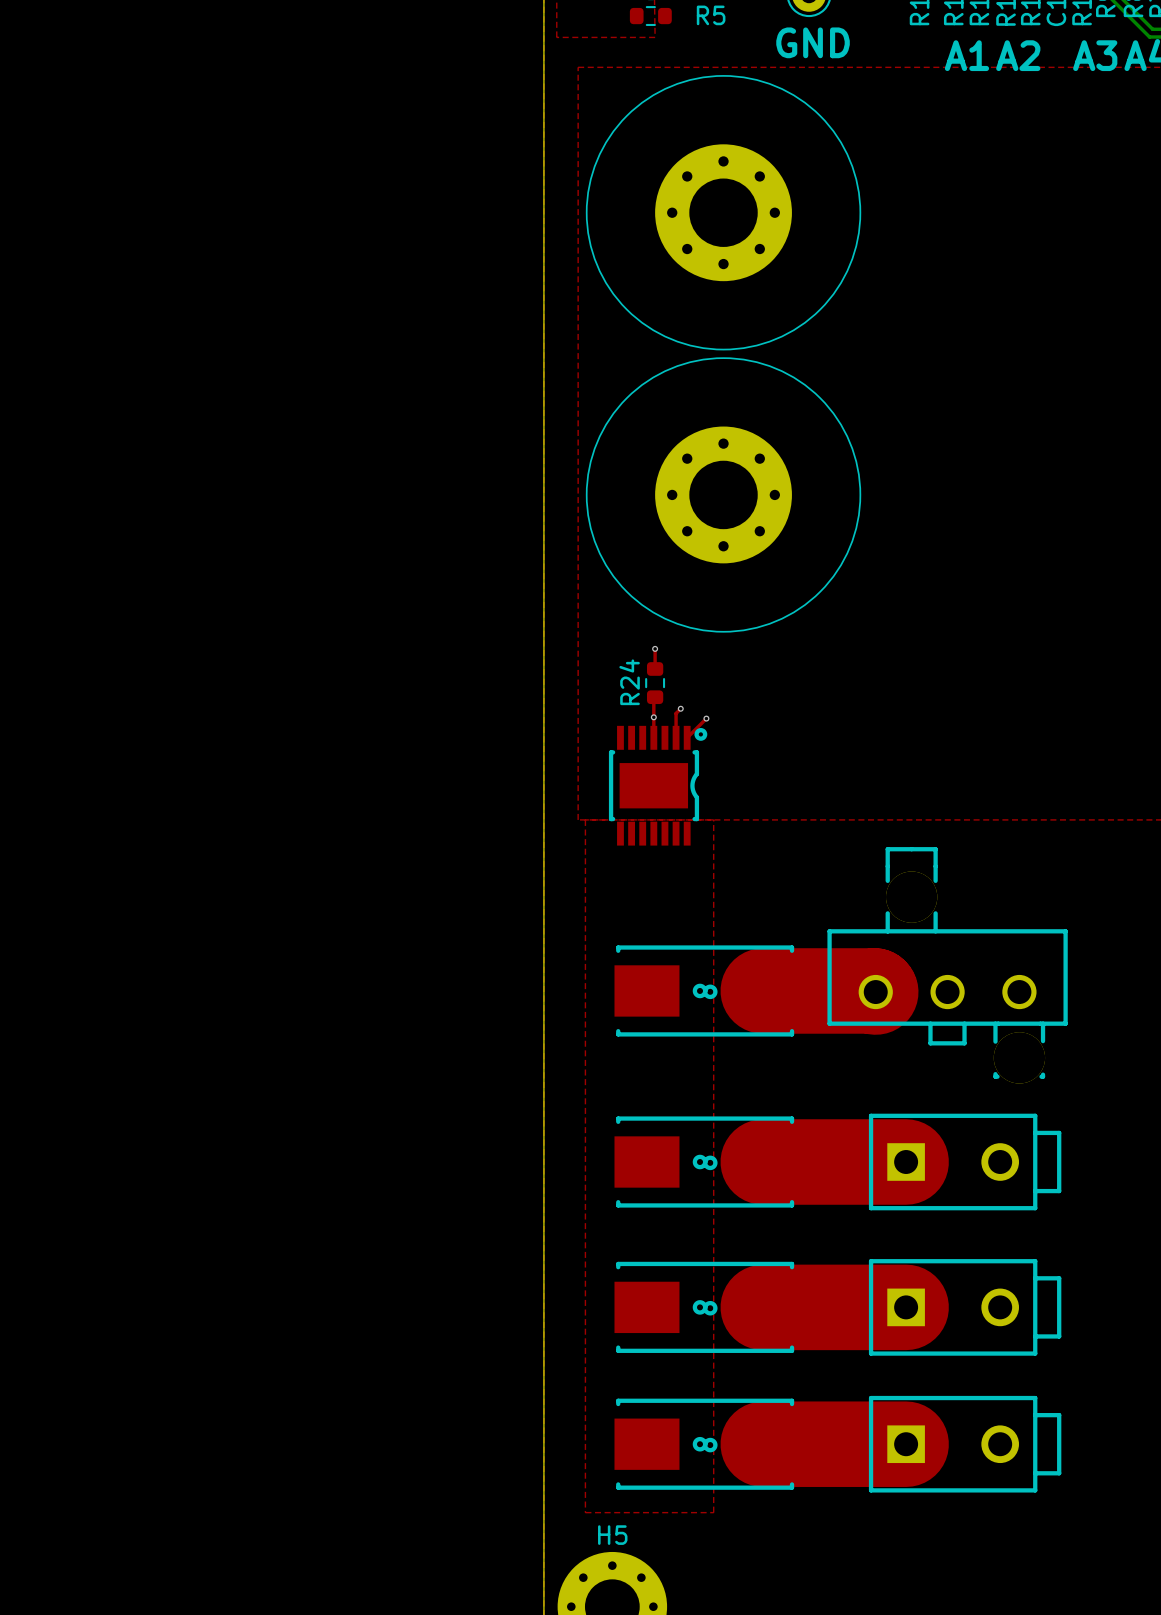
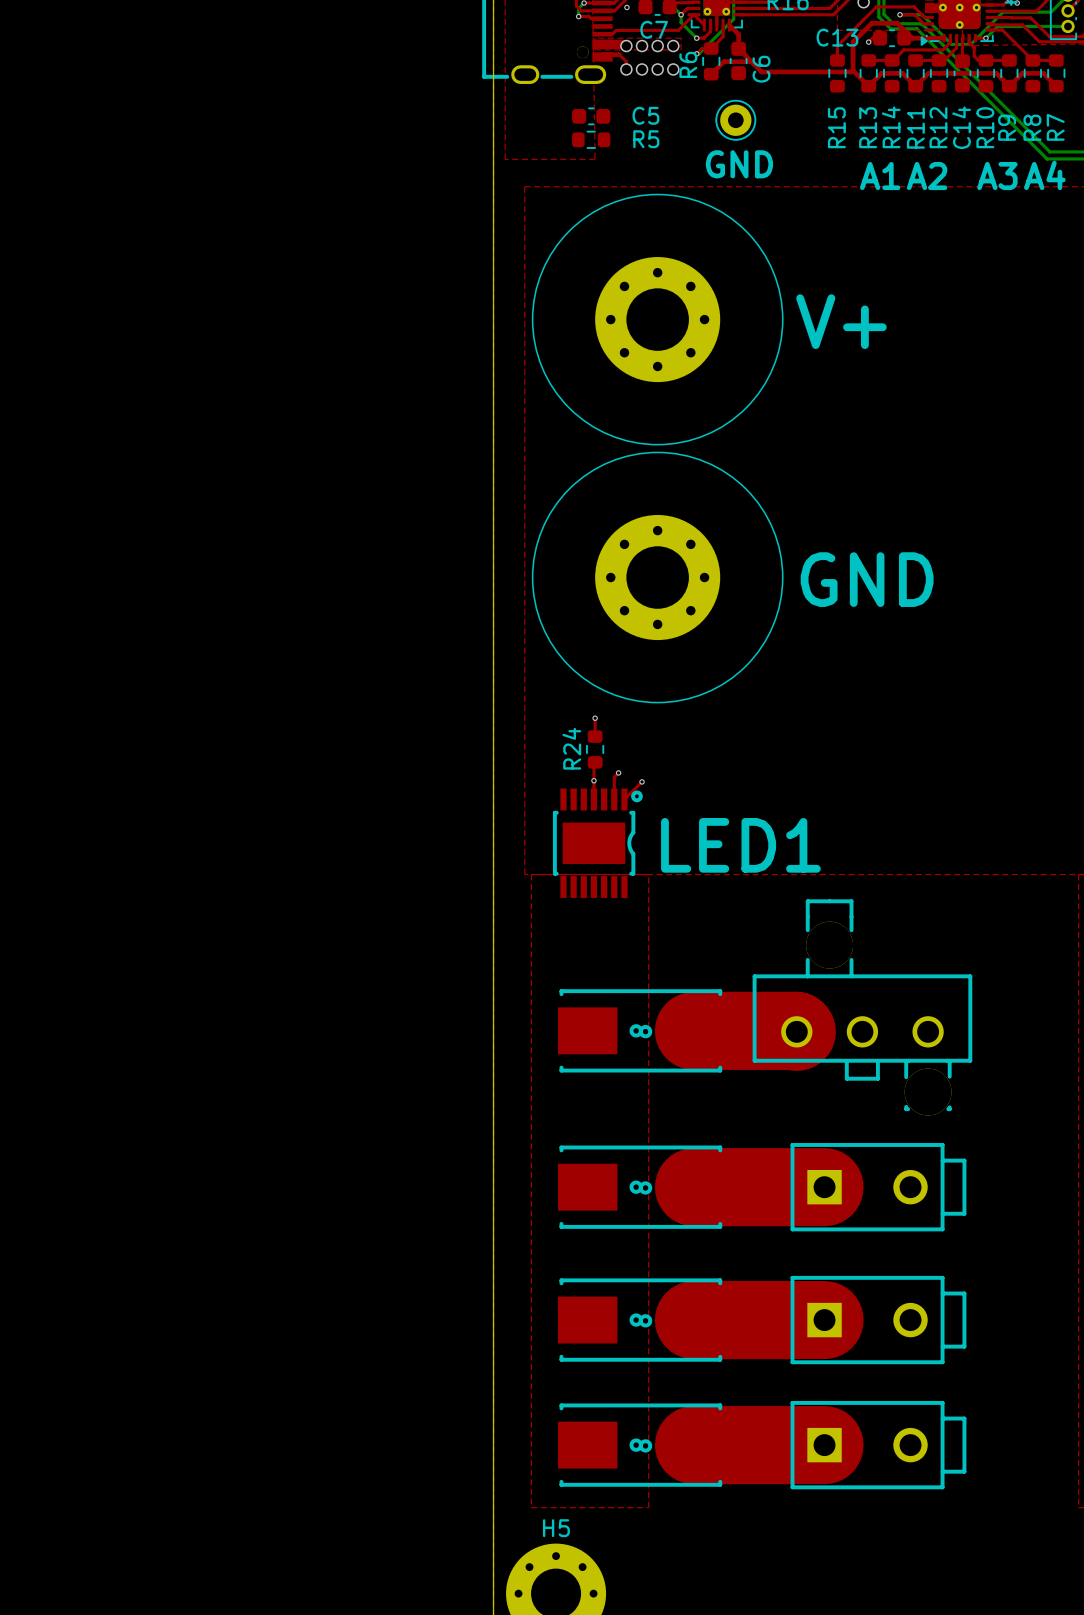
text: none -> V+ (841, 321)
text: none -> GND (867, 579)
text: none -> LED1 (740, 845)

